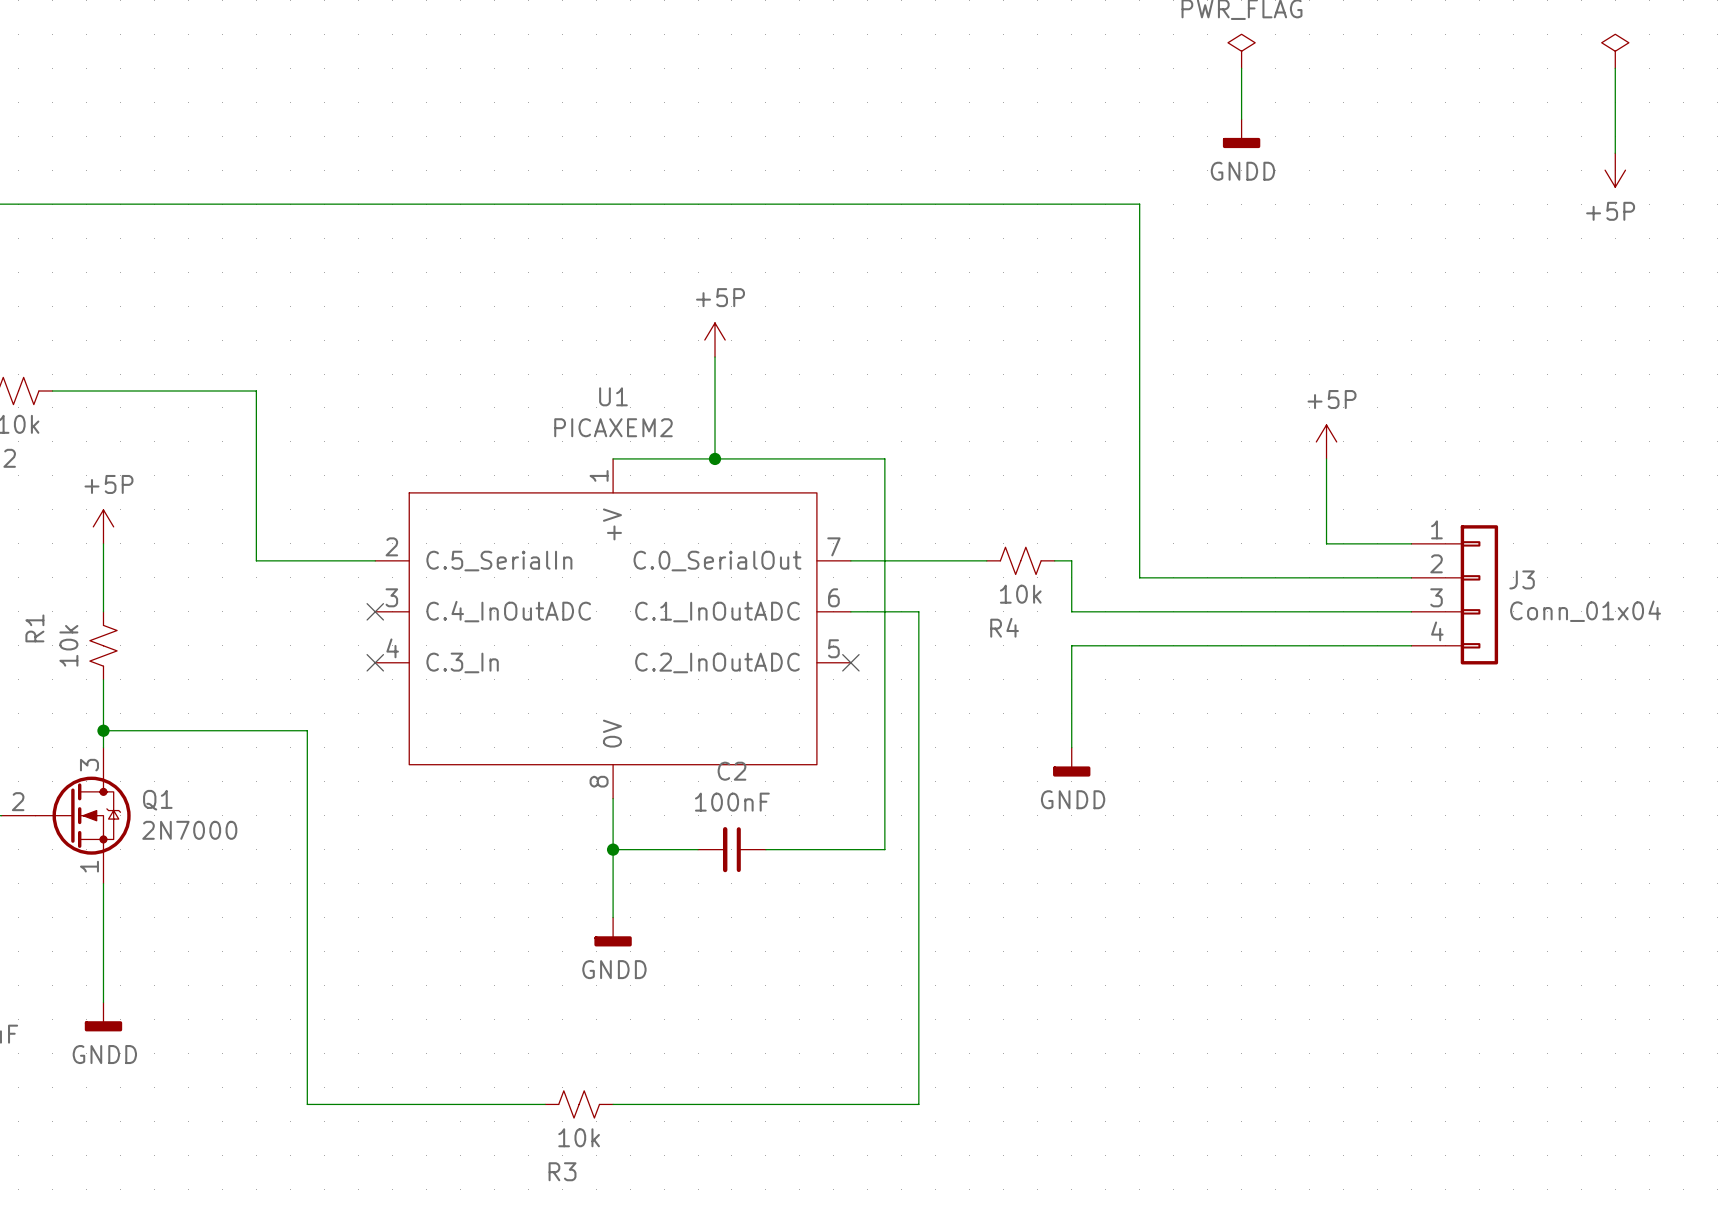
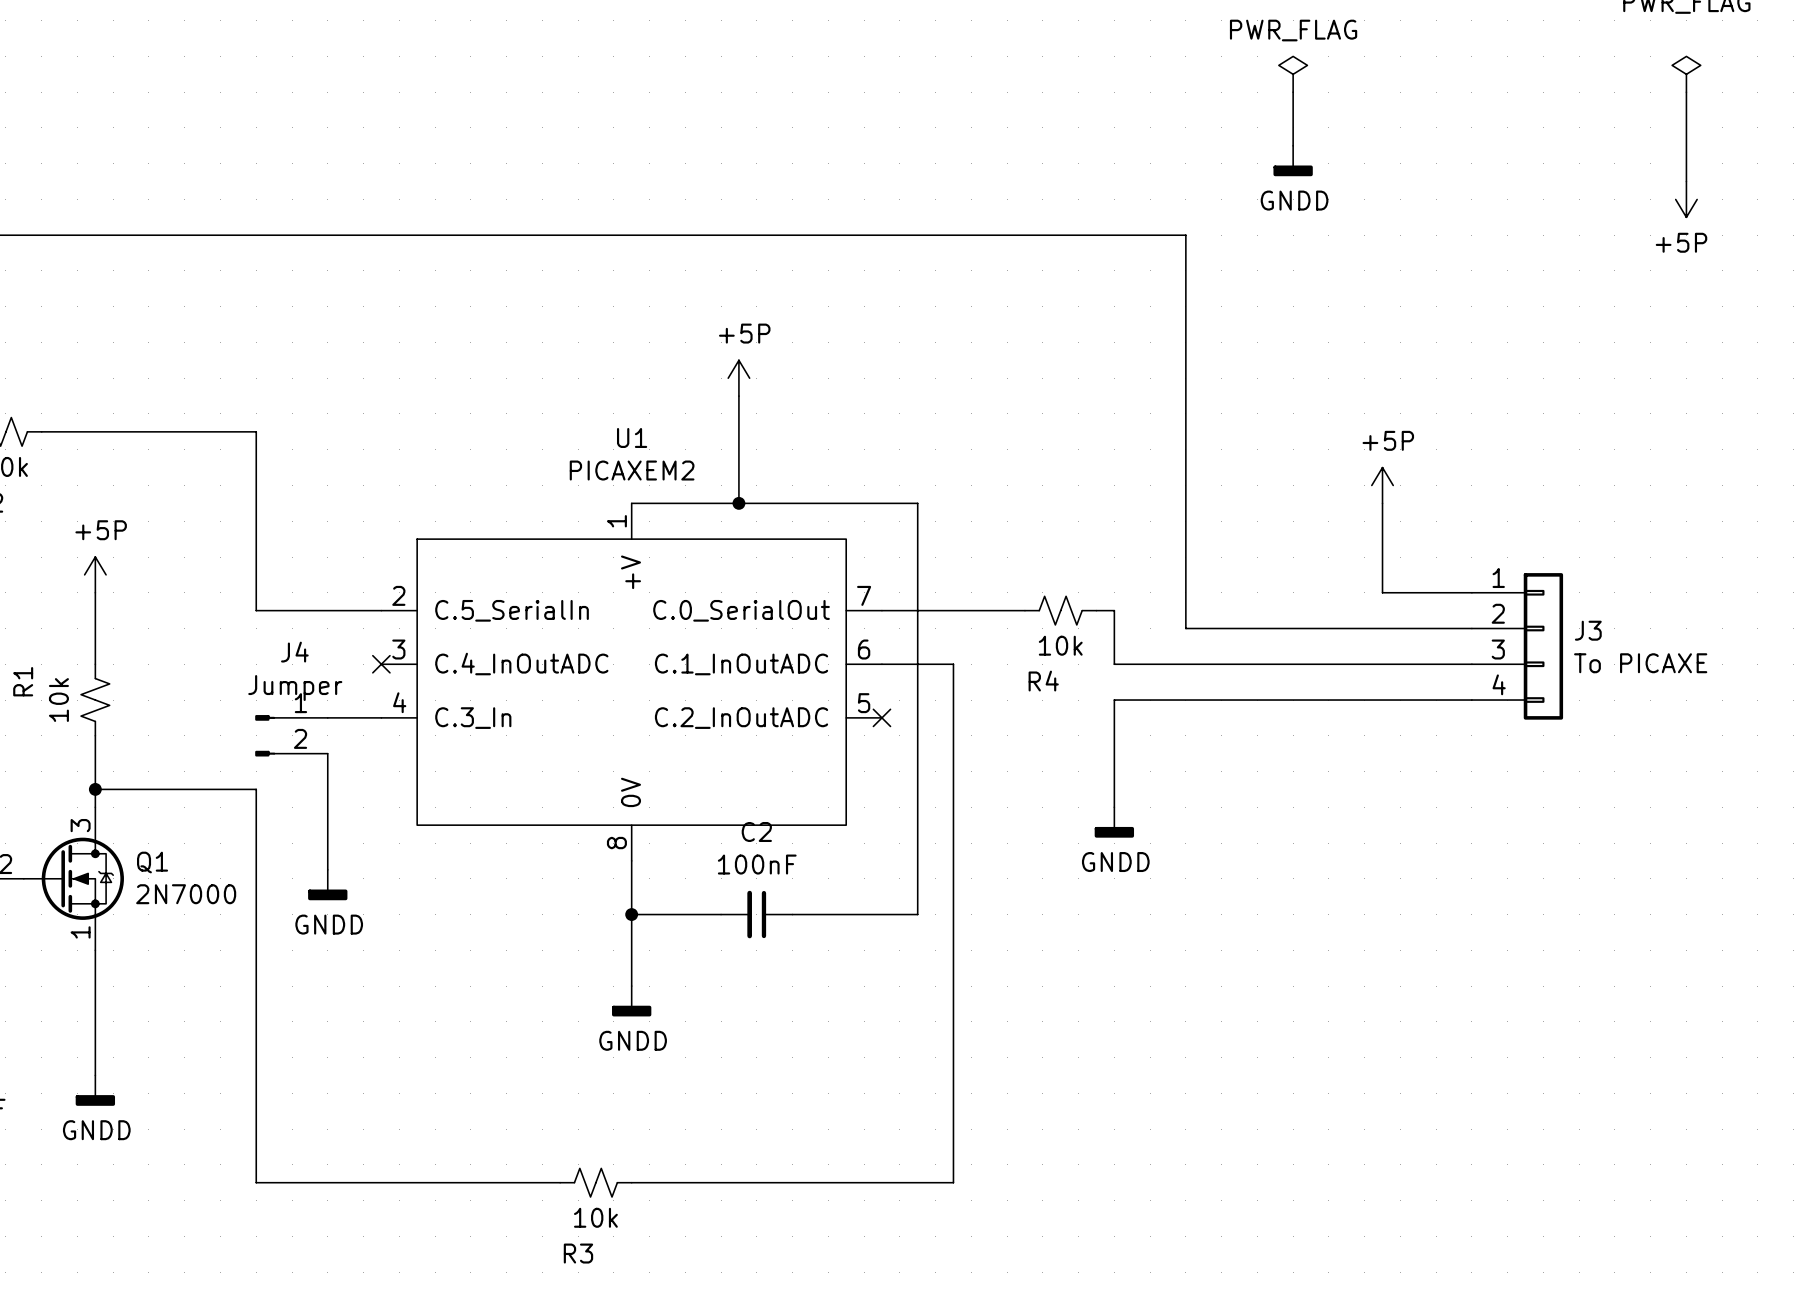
J3 value: Conn_01x04 (1585, 611) -> To PICAXE (1640, 663)
wire: none -> (327, 717) (381, 717)
no-connect mark: (375, 662) -> none
J4: none -> Jumper (291, 735)
wire: none -> (327, 753) (327, 869)
wire: (256, 730) (307, 730) (307, 1104) -> (256, 789) (256, 1182) (309, 1182)
power symbol: none -> GNDD (327, 885)

